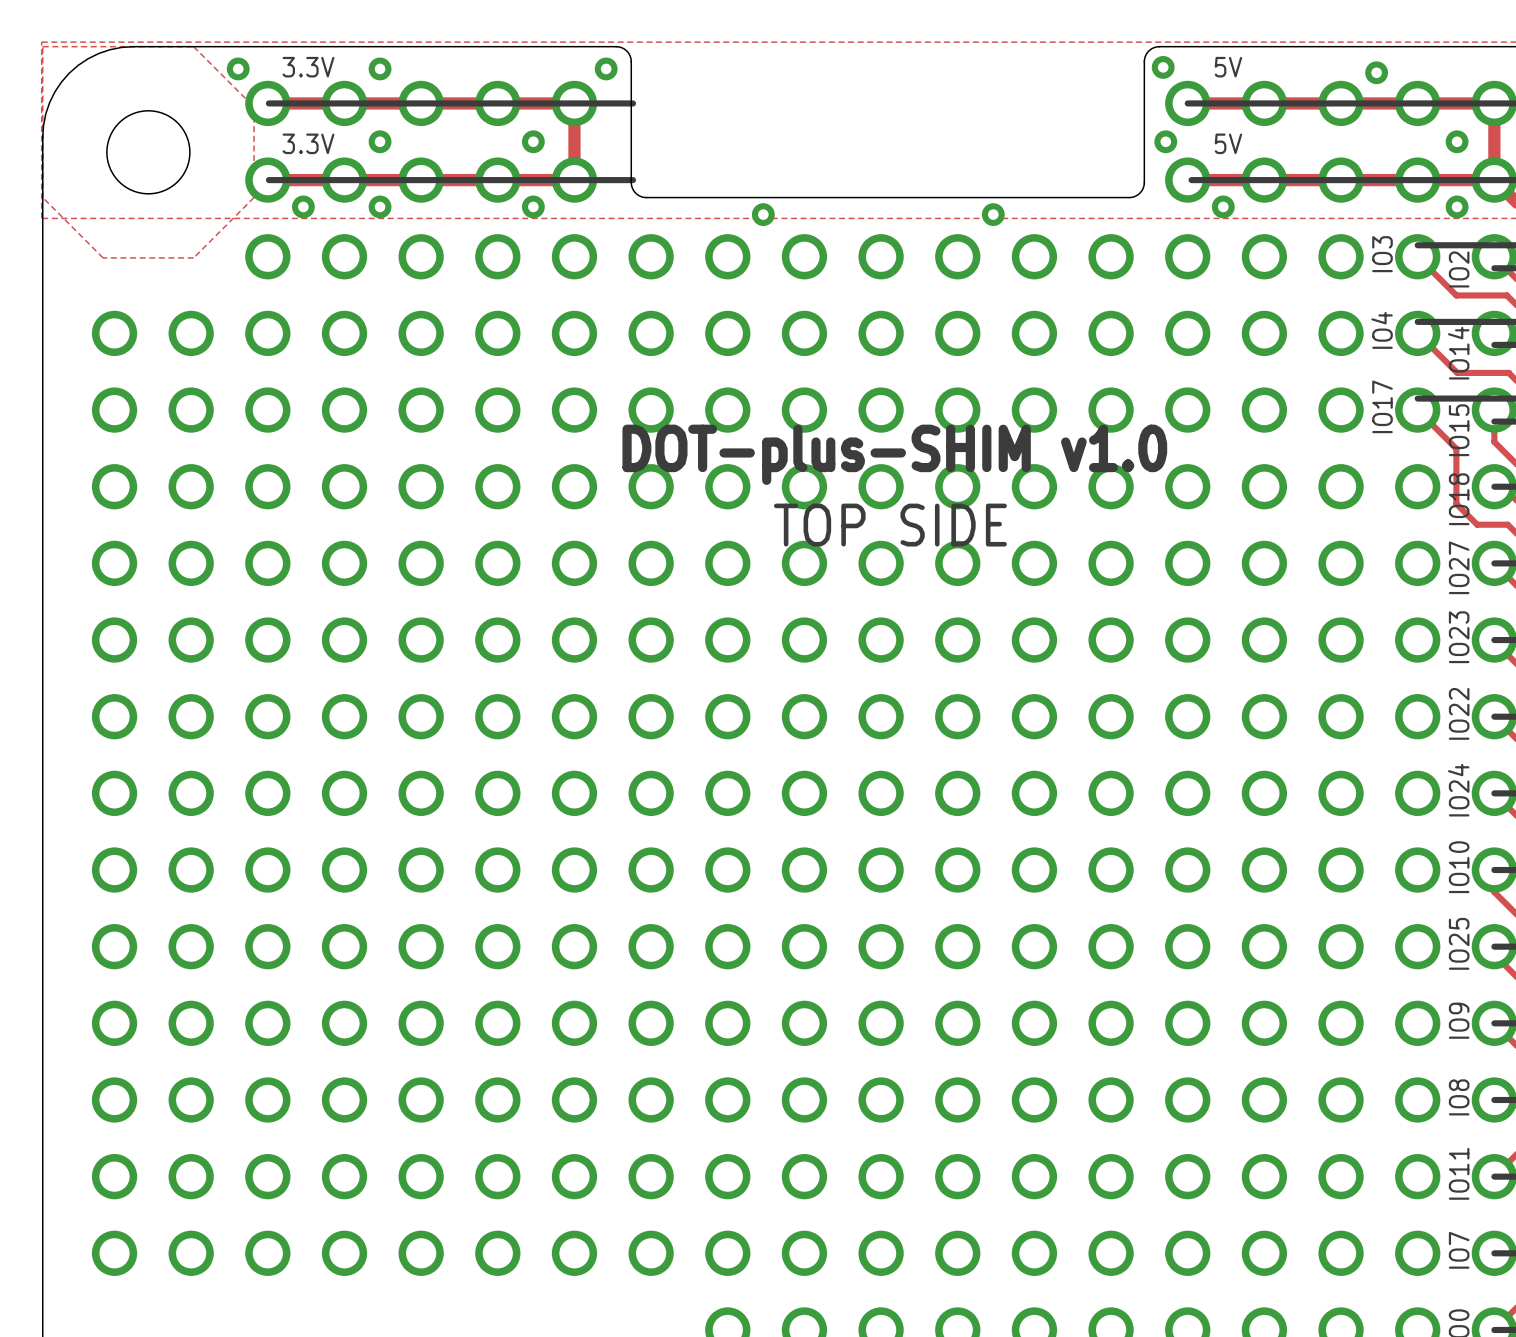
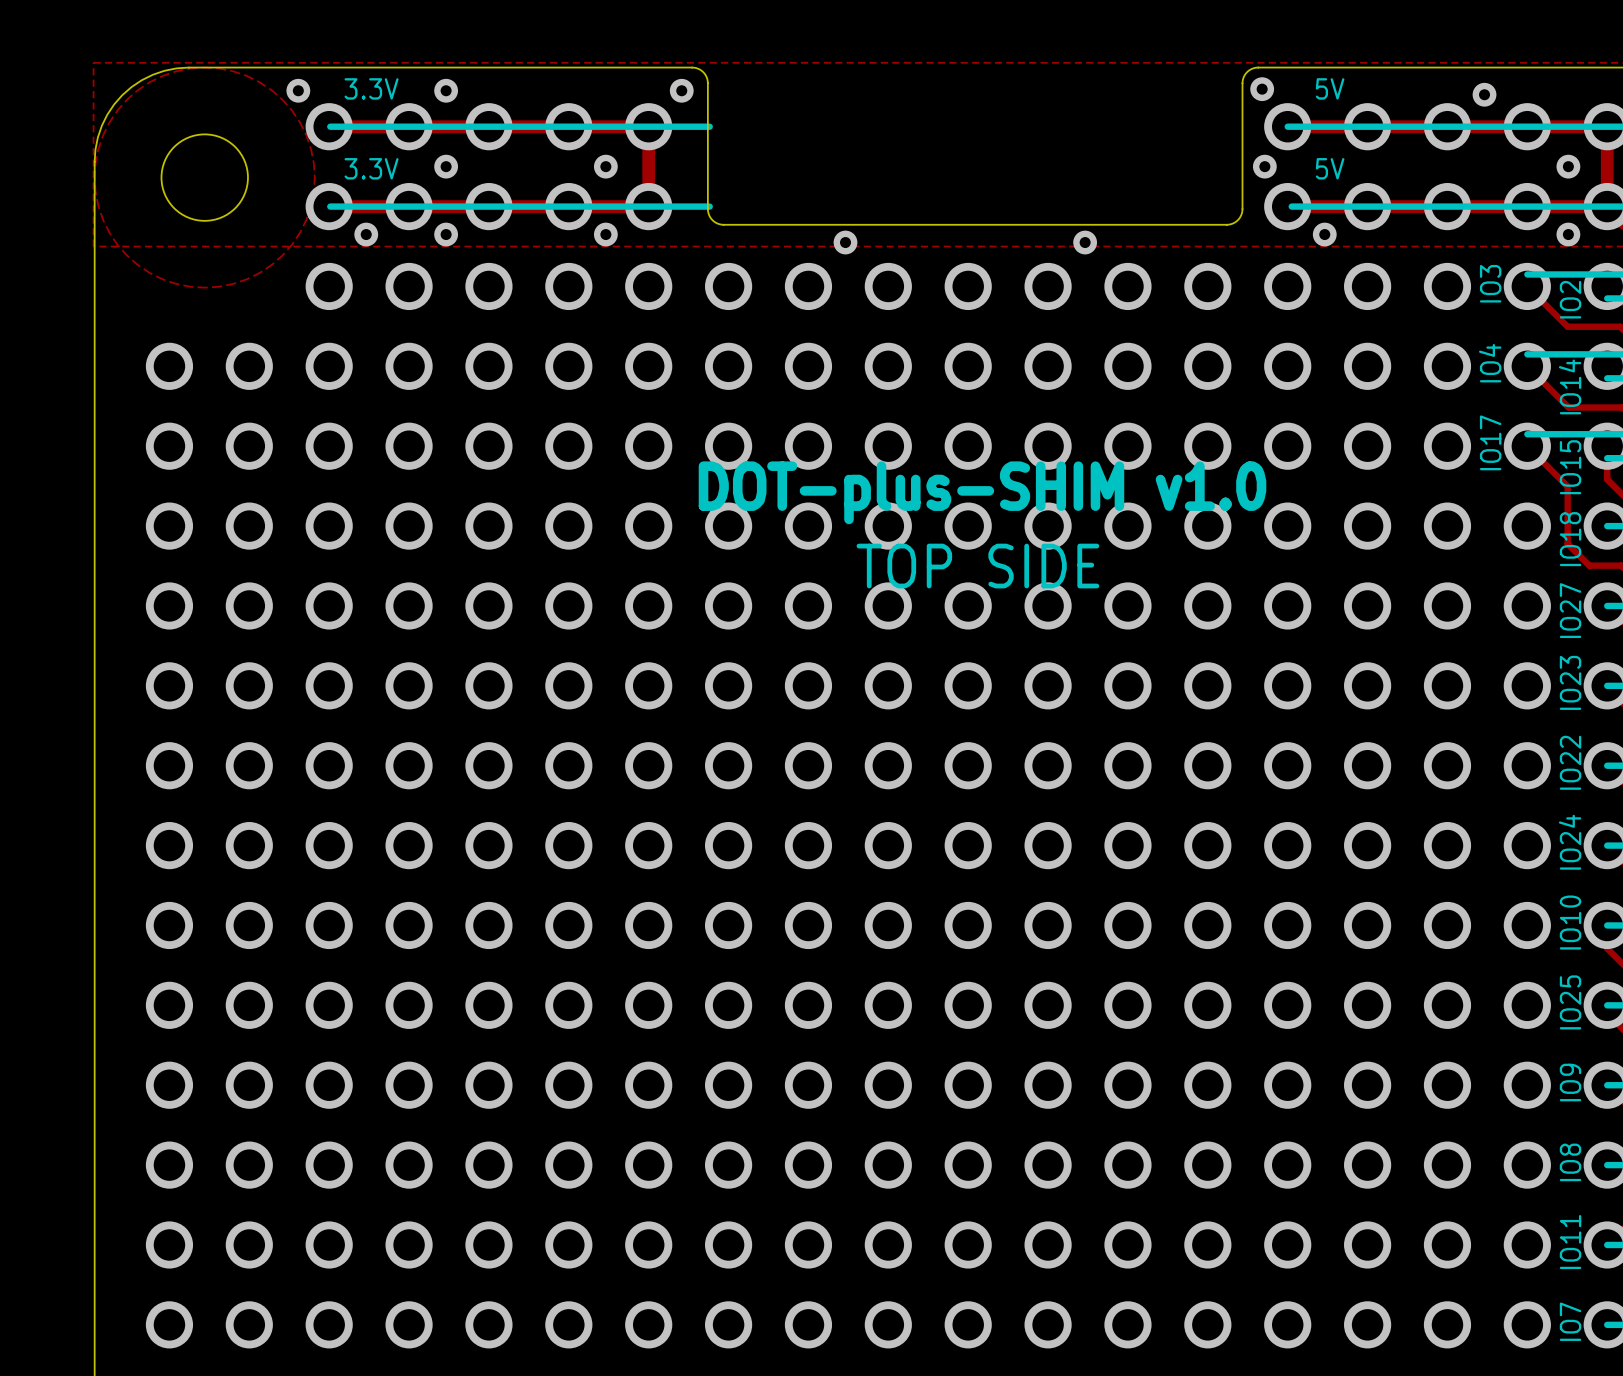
zone outline: (42, 46) (193, 46) (254, 107) (254, 197) (193, 257) (103, 257) (42, 197) (42, 46) -> (204, 67) (176, 71) (162, 75) (149, 82) (126, 99) (117, 110) (103, 135) (95, 163) (94, 177) (95, 191) (103, 219) (117, 244) (126, 255) (137, 264) (162, 279) (176, 283) (204, 287) (233, 283) (246, 279) (271, 264) (282, 255) (292, 244) (306, 219) (313, 191) (314, 177) (313, 163) (306, 135) (292, 110) (282, 99) (259, 82) (246, 75) (233, 71) (204, 67)

